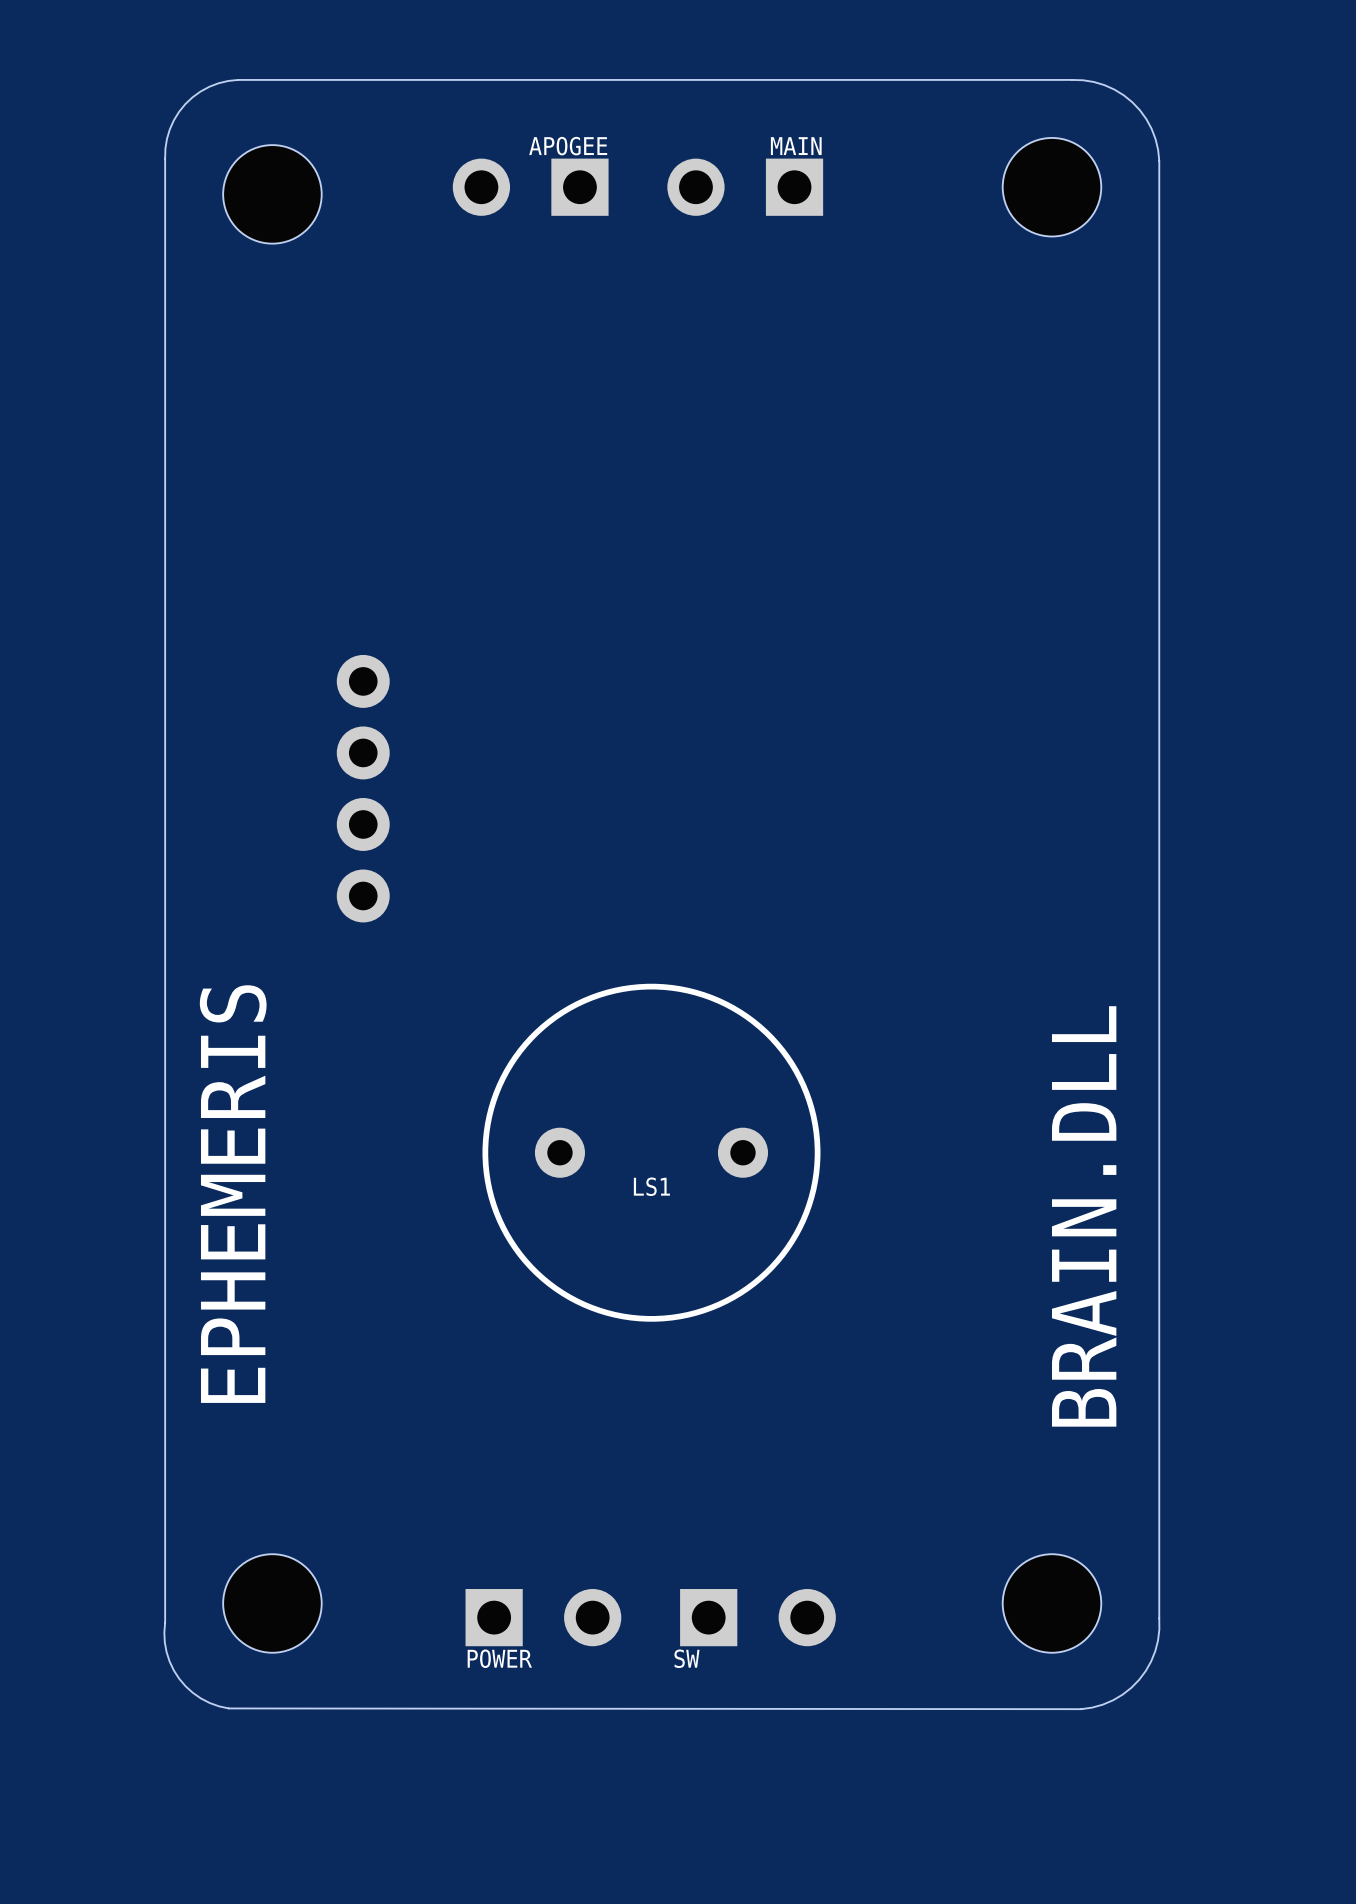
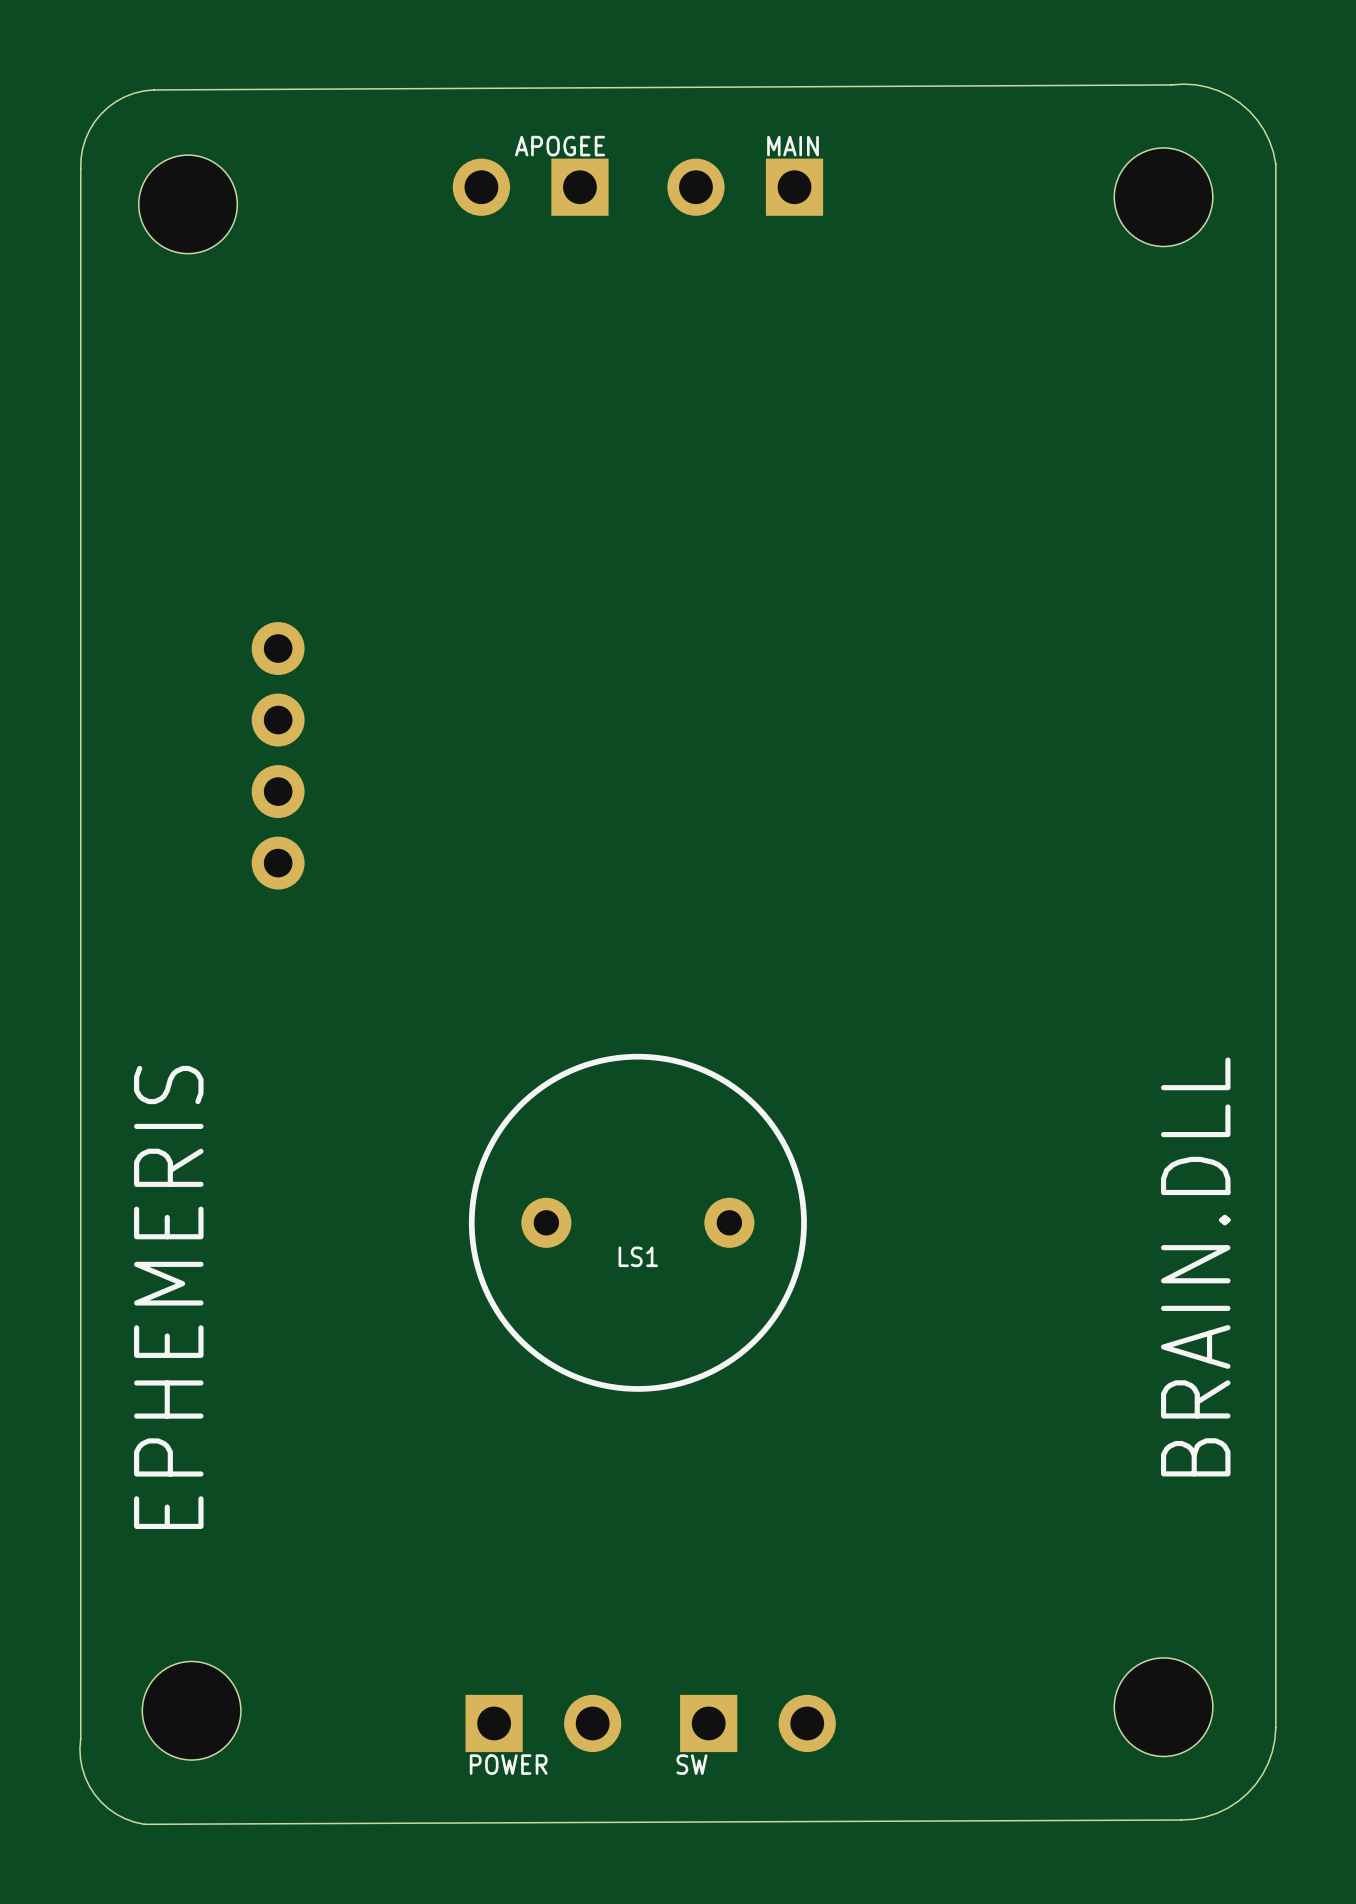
board edge: (1072, 79) (238, 79) (218, 83) (200, 91) (185, 104) (173, 120) (166, 138) (165, 158) (164, 1632) (166, 1652) (173, 1670) (185, 1686) (201, 1698) (228, 1708) (1081, 1709) (1102, 1704) (1122, 1694) (1139, 1679) (1151, 1661) (1159, 1629) (1159, 160) (1151, 128) (1132, 102) (1104, 85) (1072, 79) -> (1171, 84) (1183, 84) (1207, 87) (1219, 91) (1240, 103) (1257, 120) (1264, 130) (1273, 152) (1275, 164) (1275, 1727) (1272, 1751) (1262, 1774) (1247, 1793) (1227, 1808) (1205, 1817) (1180, 1820) (144, 1824) (116, 1814) (101, 1802) (89, 1786) (82, 1767) (79, 1748) (80, 168) (82, 148) (89, 130) (100, 114) (116, 101) (134, 93) (153, 89) (1171, 84)
hole position: (1051, 187) -> (1163, 197)
hole position: (272, 194) -> (188, 204)
part position: (363, 788) -> (278, 755)
LS1 position: (651, 1152) -> (637, 1222)
text position: EPHEMERIS (233, 1194) -> EPHEMERIS (168, 1297)
text position: BRAIN.DLL (1084, 1216) -> BRAIN.DLL (1195, 1266)
hole position: (272, 1603) -> (191, 1710)
hole position: (1051, 1603) -> (1163, 1707)
POWER position: (543, 1617) -> (543, 1723)
SW position: (757, 1617) -> (757, 1723)

